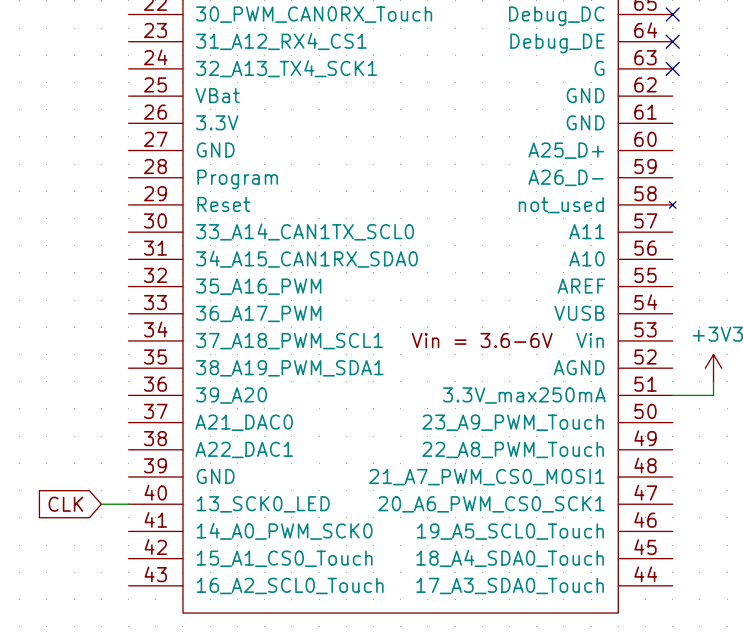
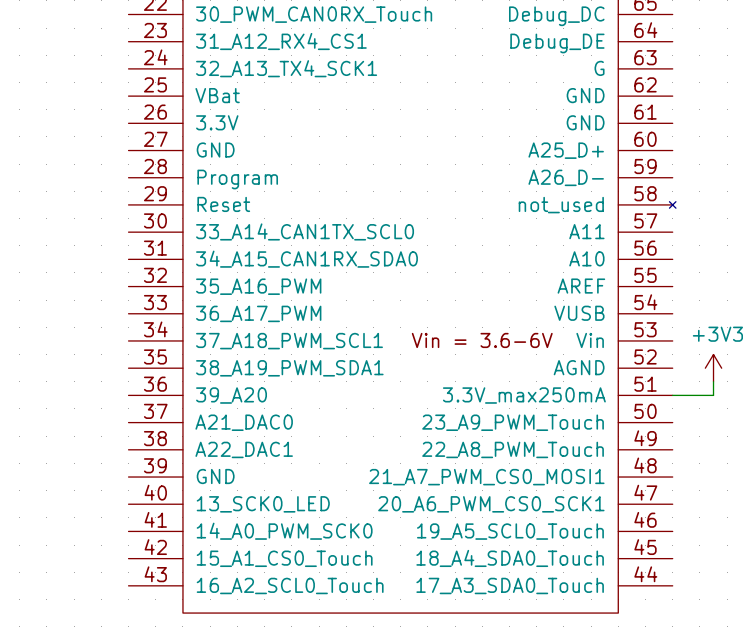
no-connect mark: (672, 14) -> none
no-connect mark: (672, 41) -> none
no-connect mark: (672, 68) -> none
global label: CLK (65, 504) -> none
wire: (101, 504) (128, 504) -> none

